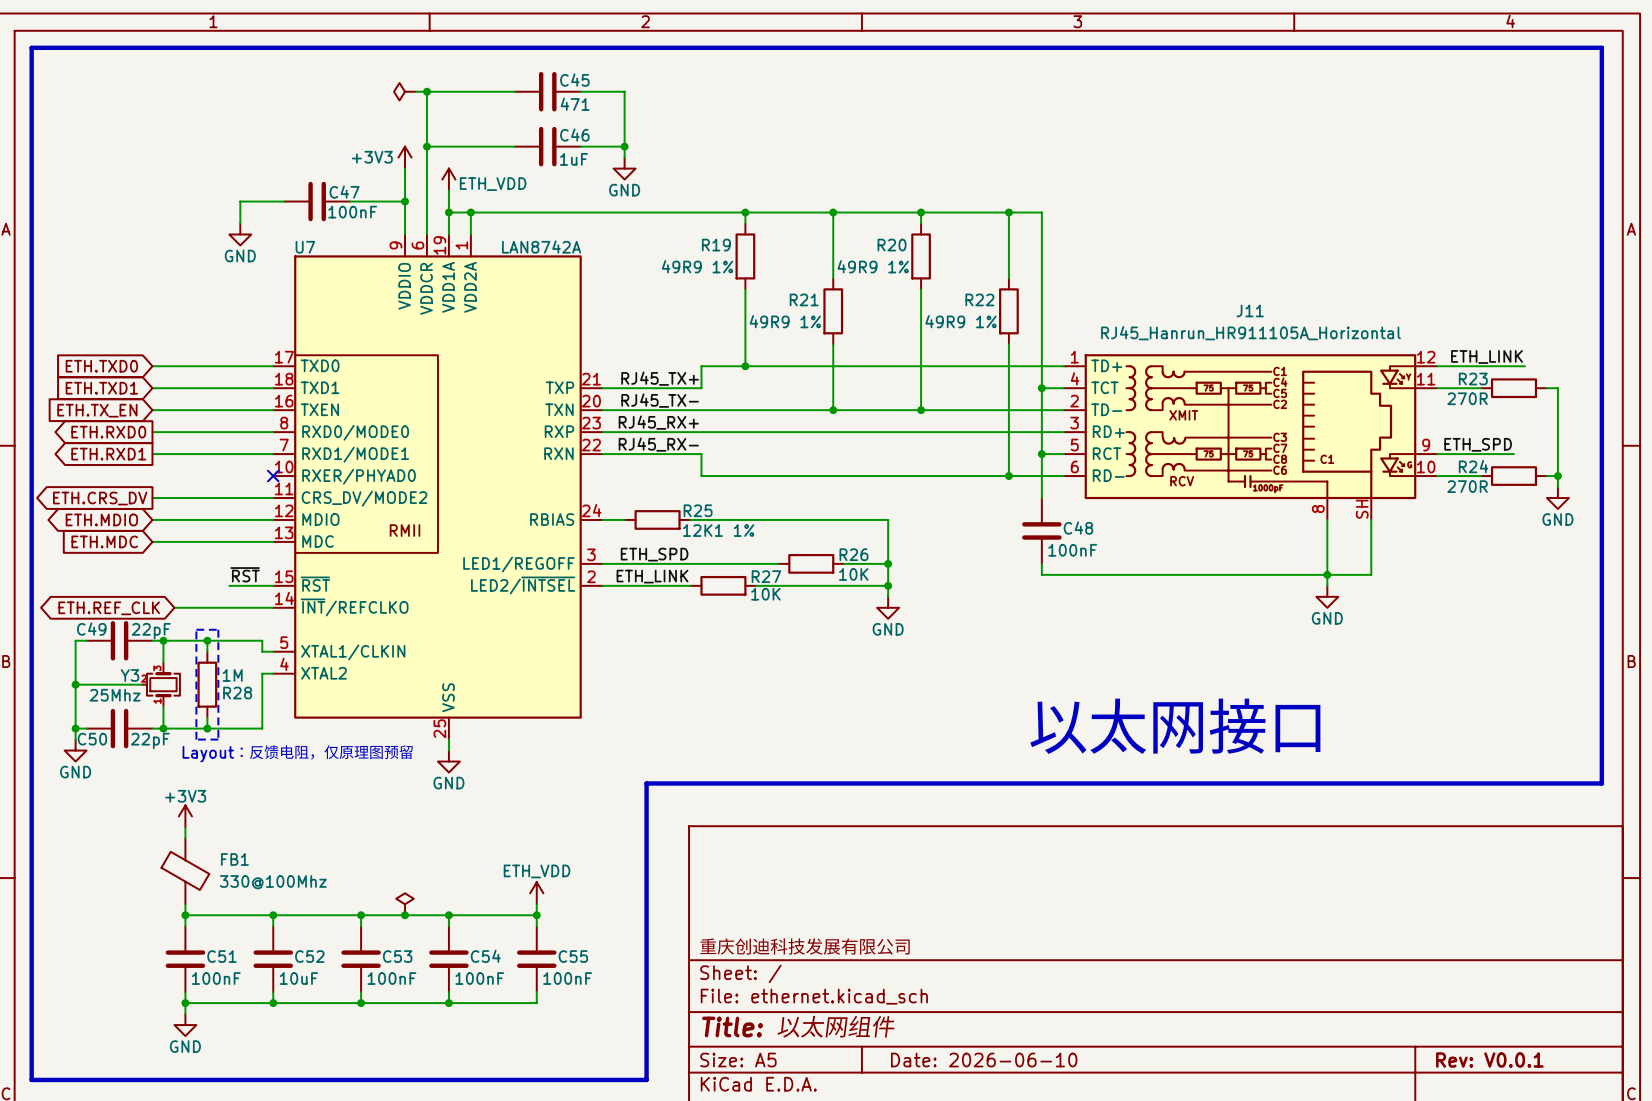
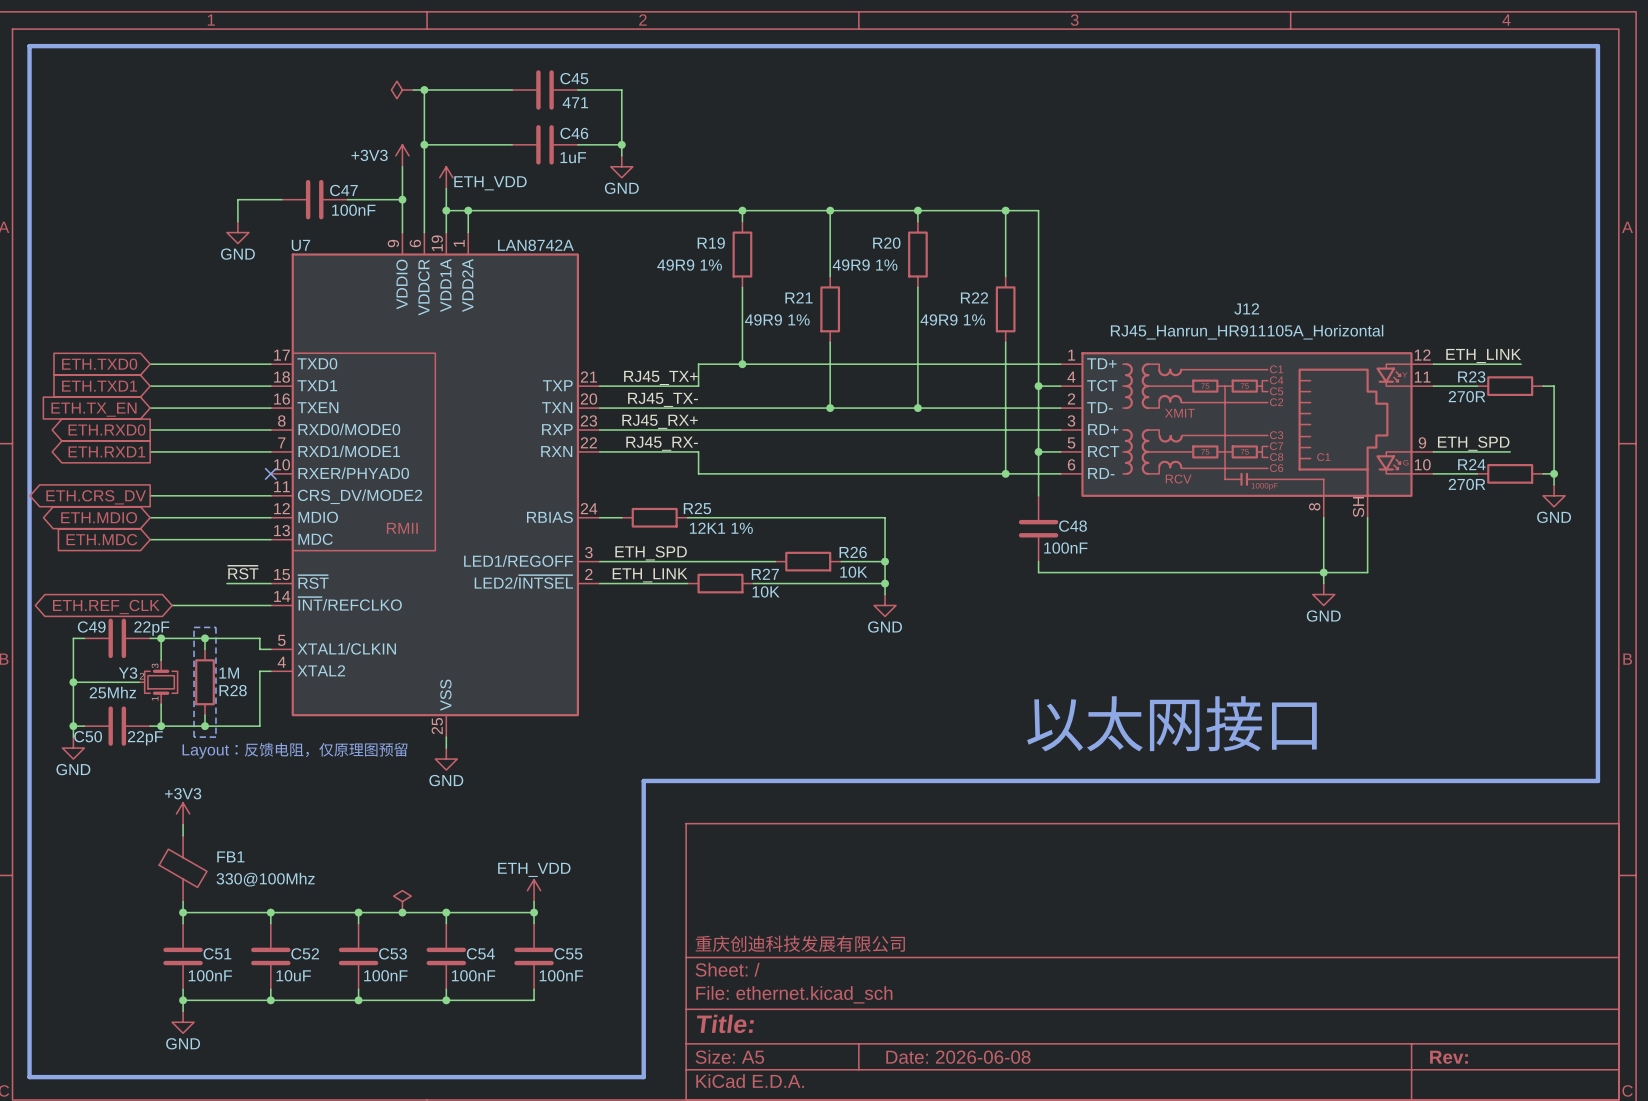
J11 name: J11 (1250, 310) -> J12 (1246, 308)
title block: Title: 以太网组件 (799, 1026) -> Title: (725, 1023)
title block: Date: 2026-06-10 (984, 1060) -> Date: 2026-06-08 (958, 1057)
title block: Rev: V0.0.1 (1489, 1060) -> Rev: (1448, 1057)

